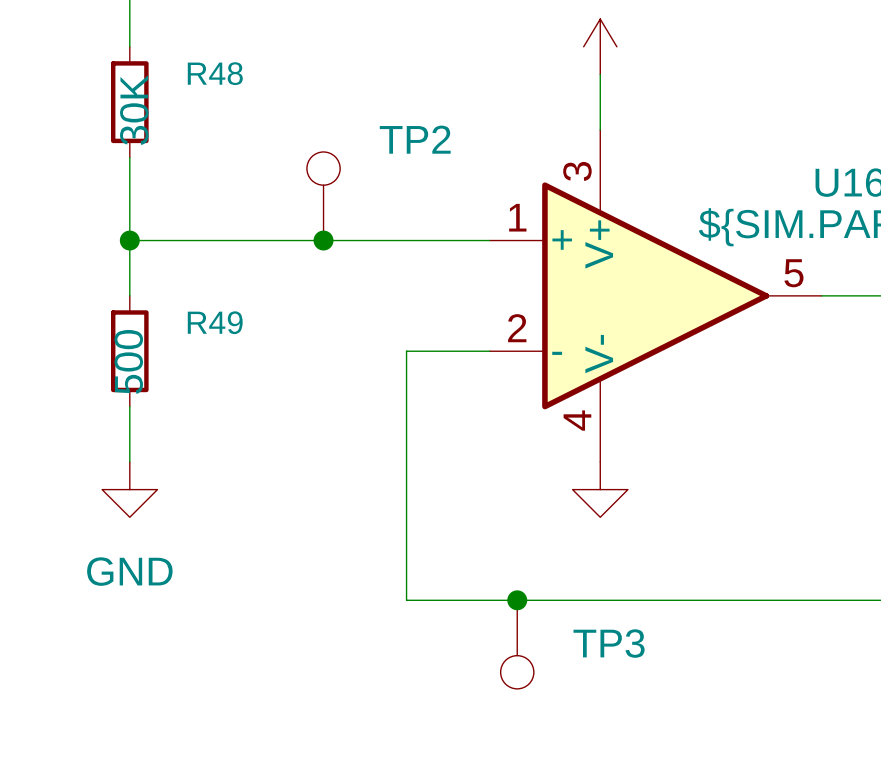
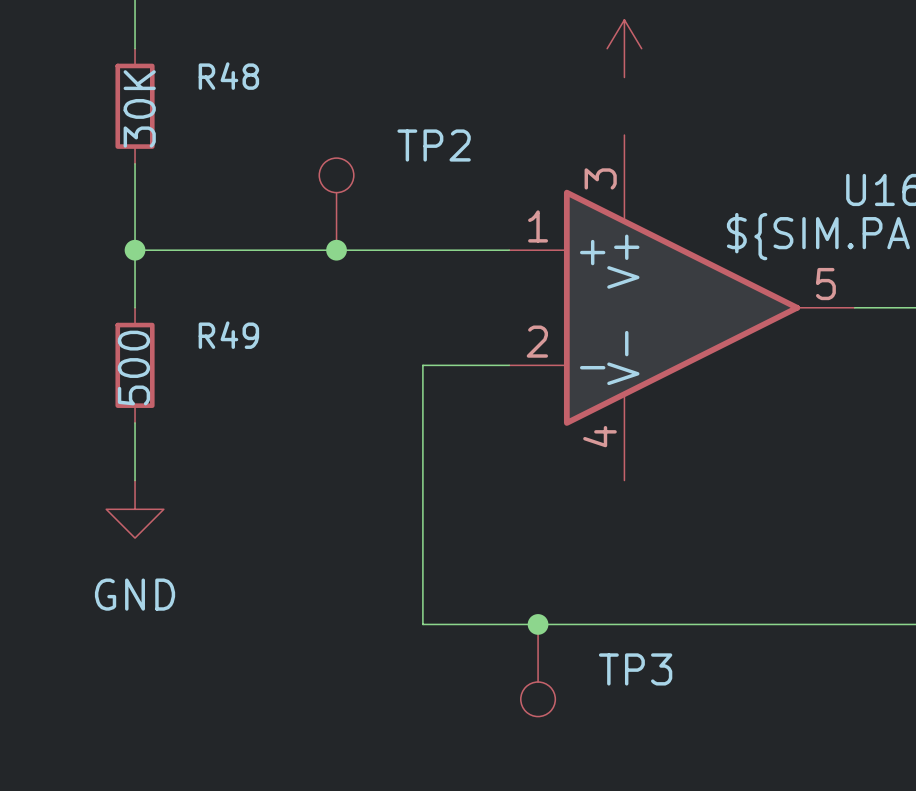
wire: (600, 74) (600, 129) -> none
power symbol: (600, 489) -> none

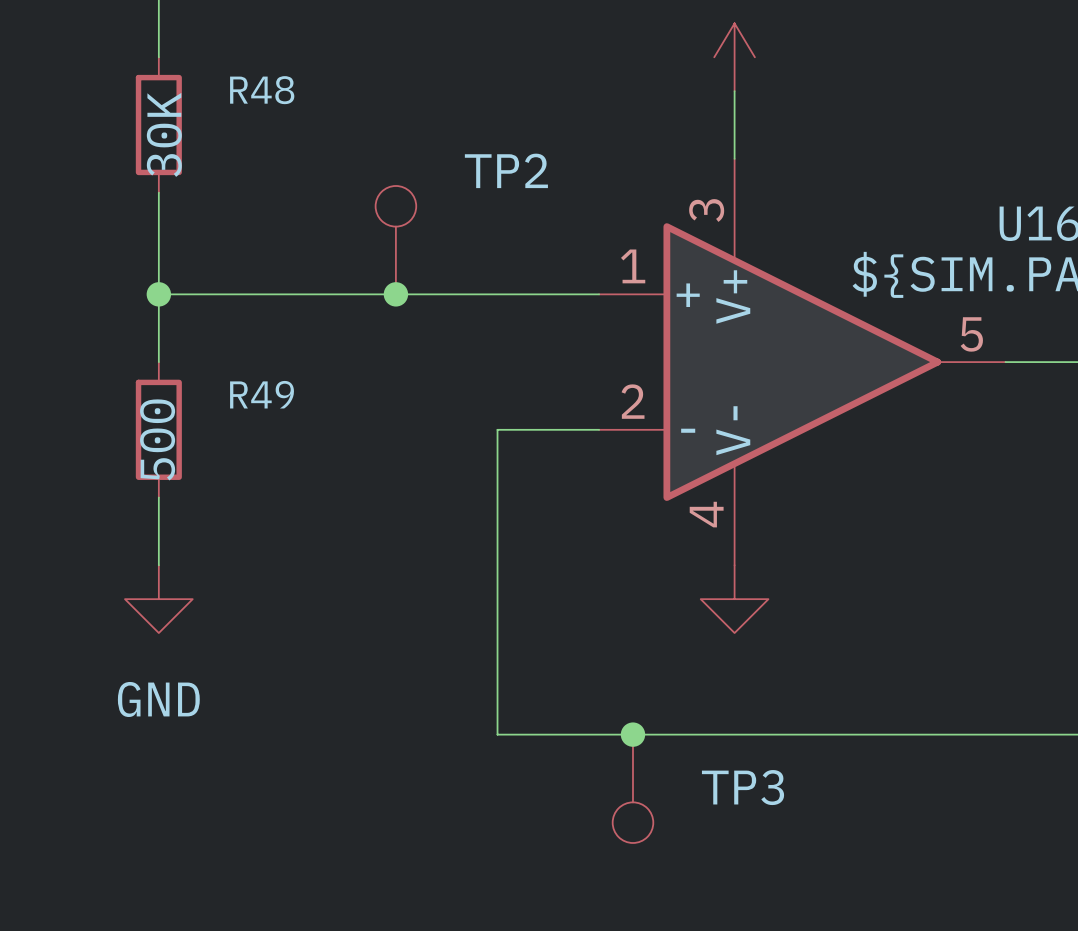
wire: none -> (734, 91) (734, 158)
power symbol: none -> (734, 599)

